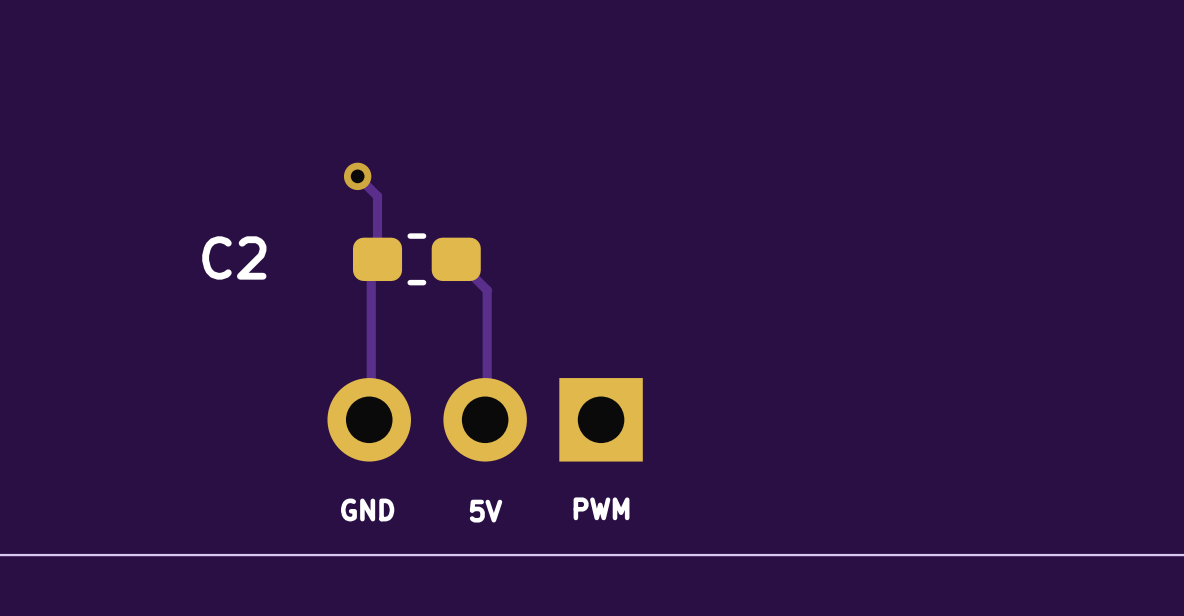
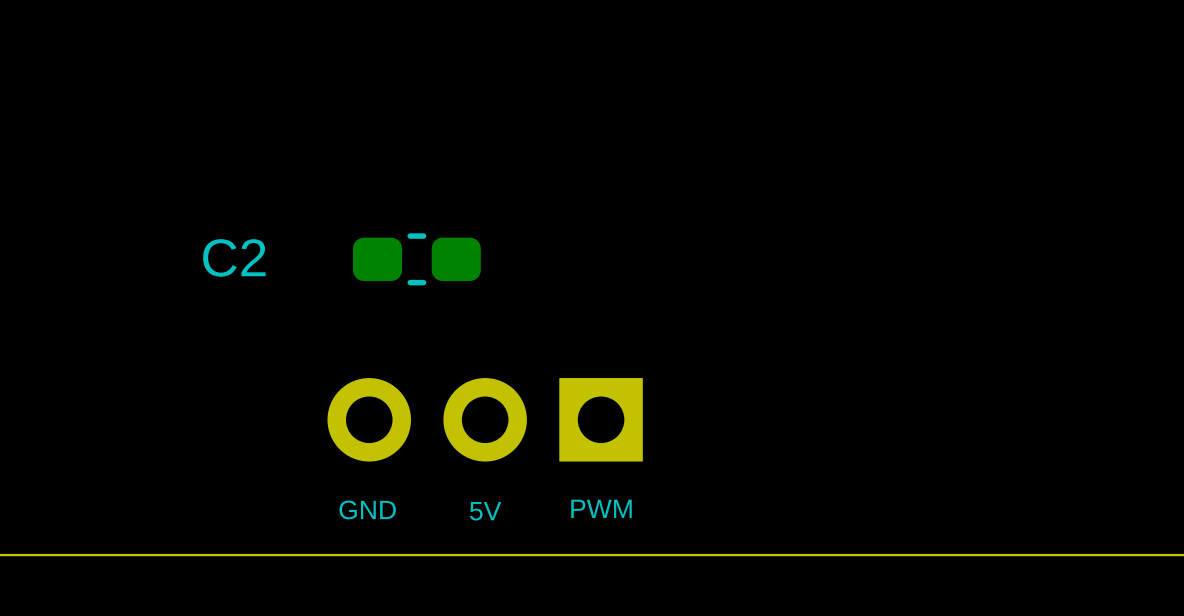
track: (357, 176) (377, 196) (377, 259) (371, 265) (371, 419) -> none
via: (357, 176) -> none
track: (456, 259) (487, 290) (487, 419) -> none

